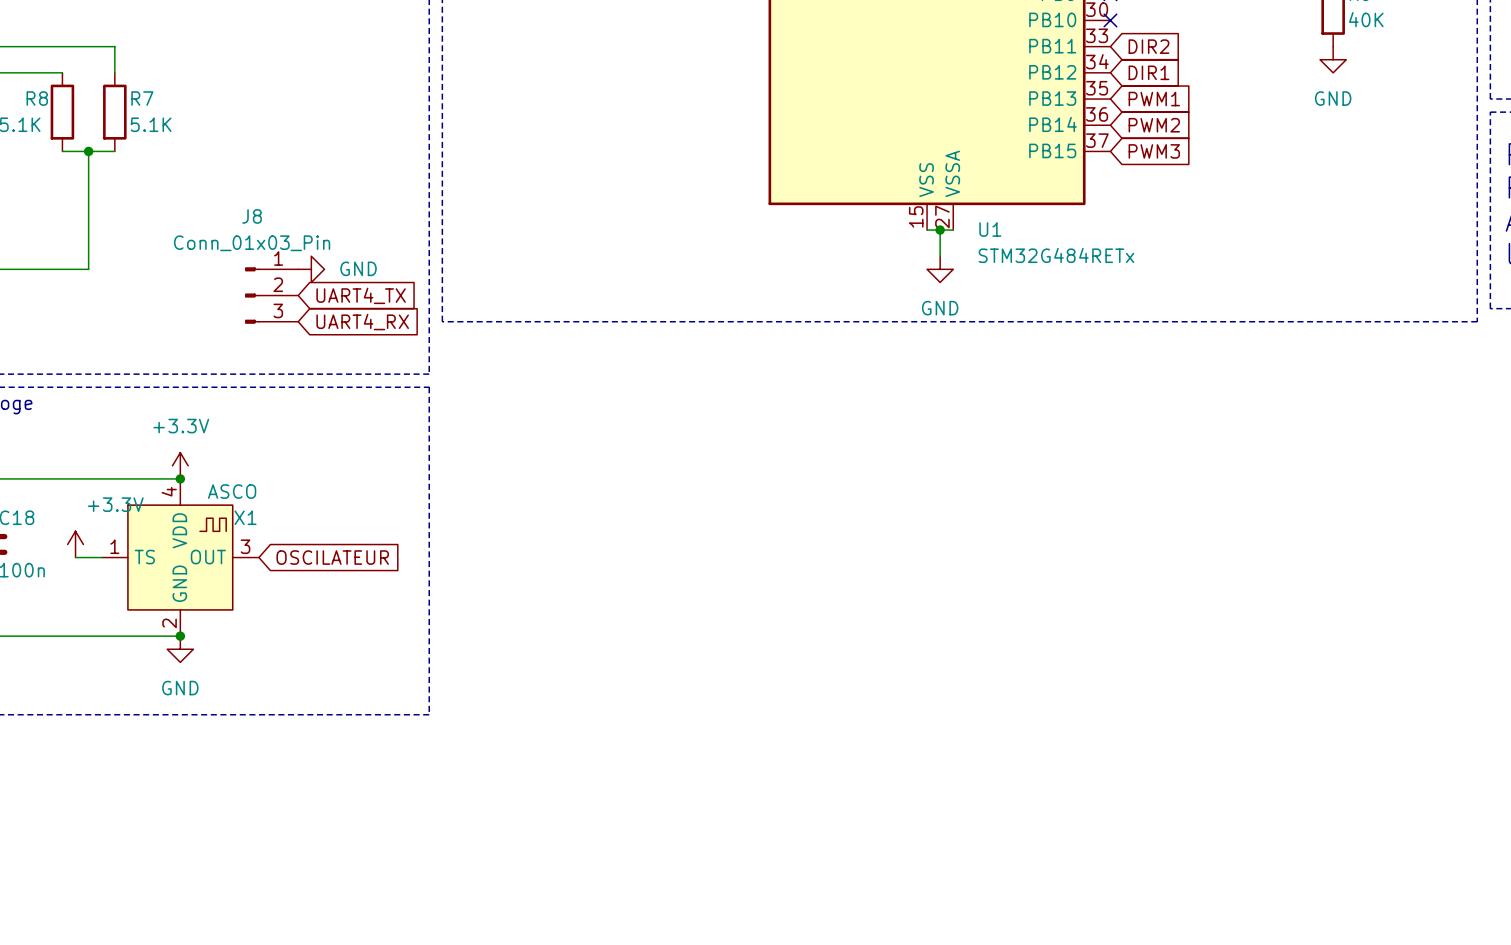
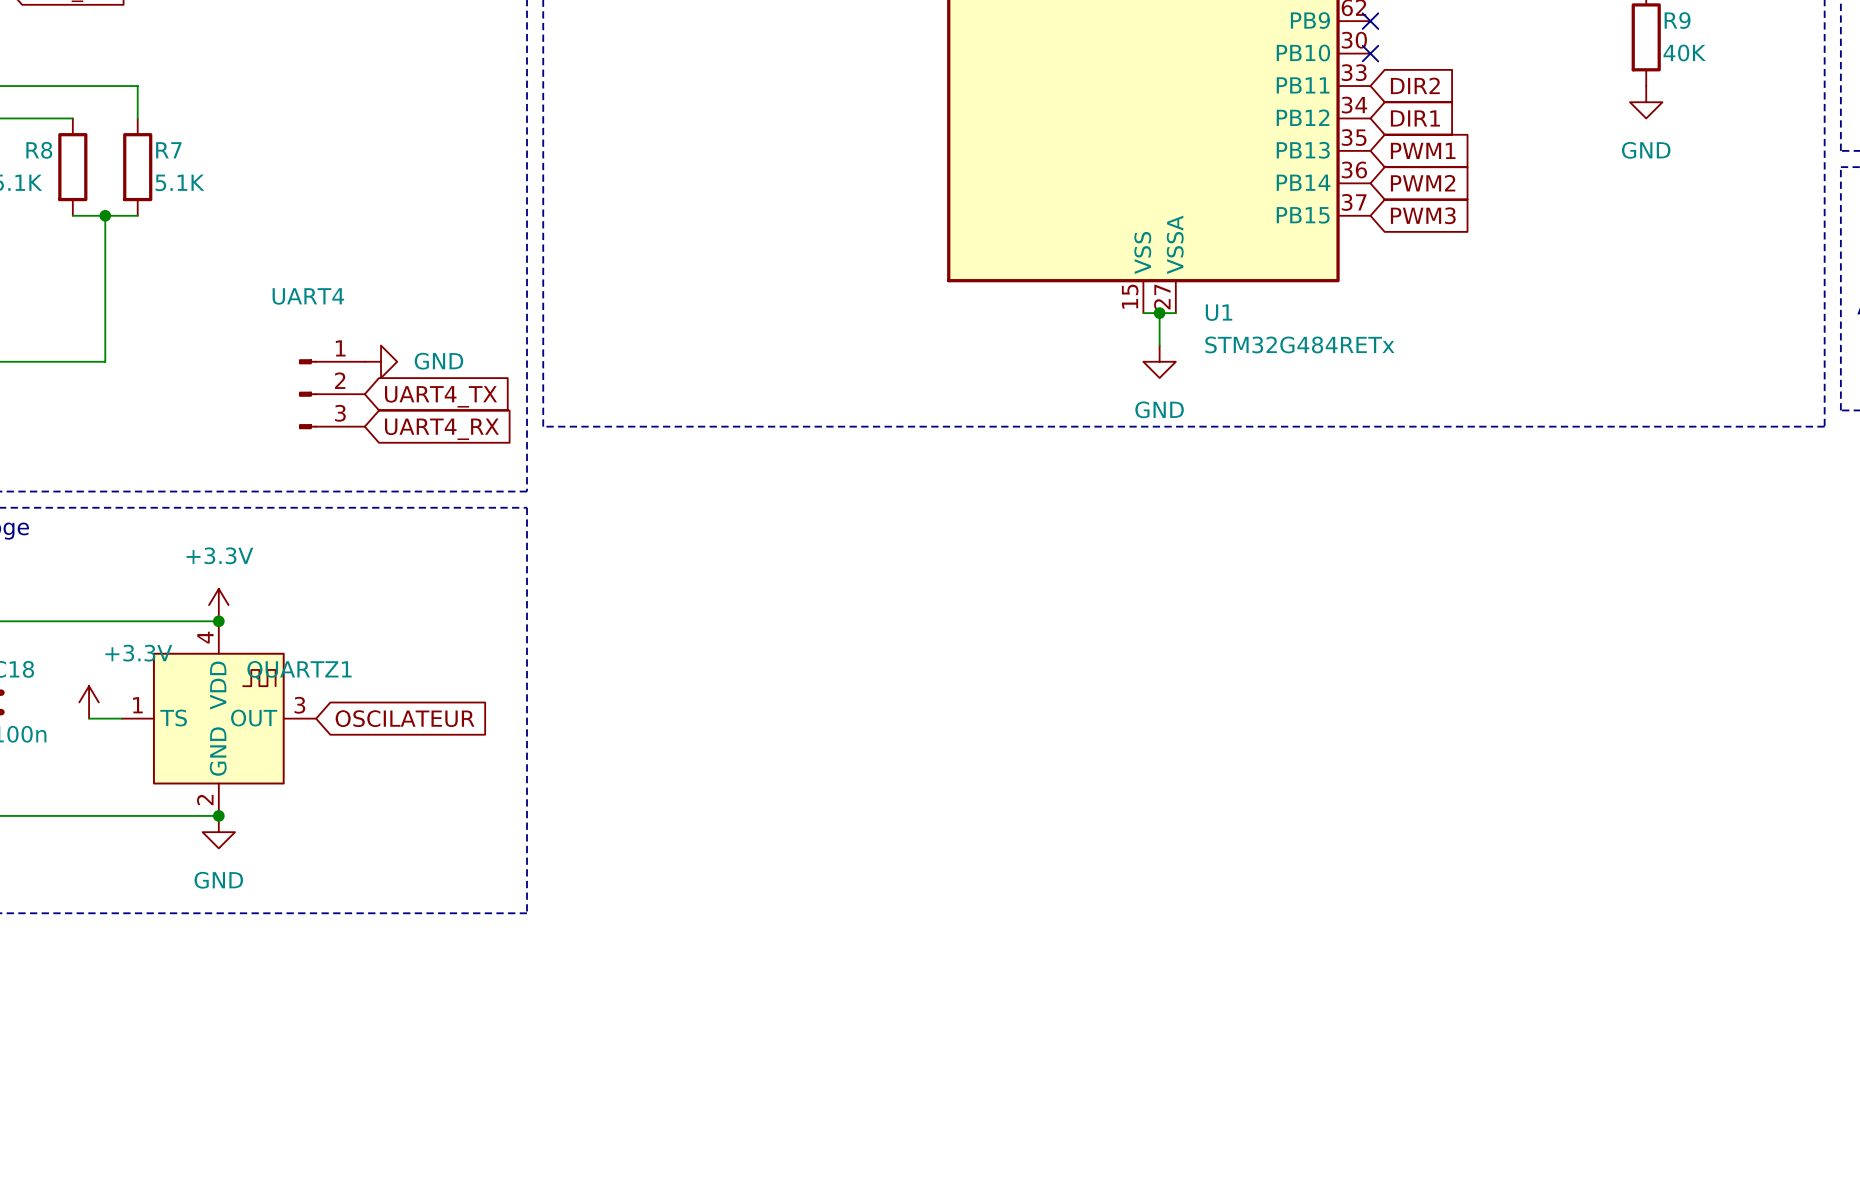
J8 name: J8 (252, 216) -> UART4 (308, 296)
J8 value: Conn_01x03_Pin (252, 243) -> none
X1 value: ASCO (232, 491) -> none
X1 name: X1 (245, 517) -> QUARTZ1 (299, 670)

